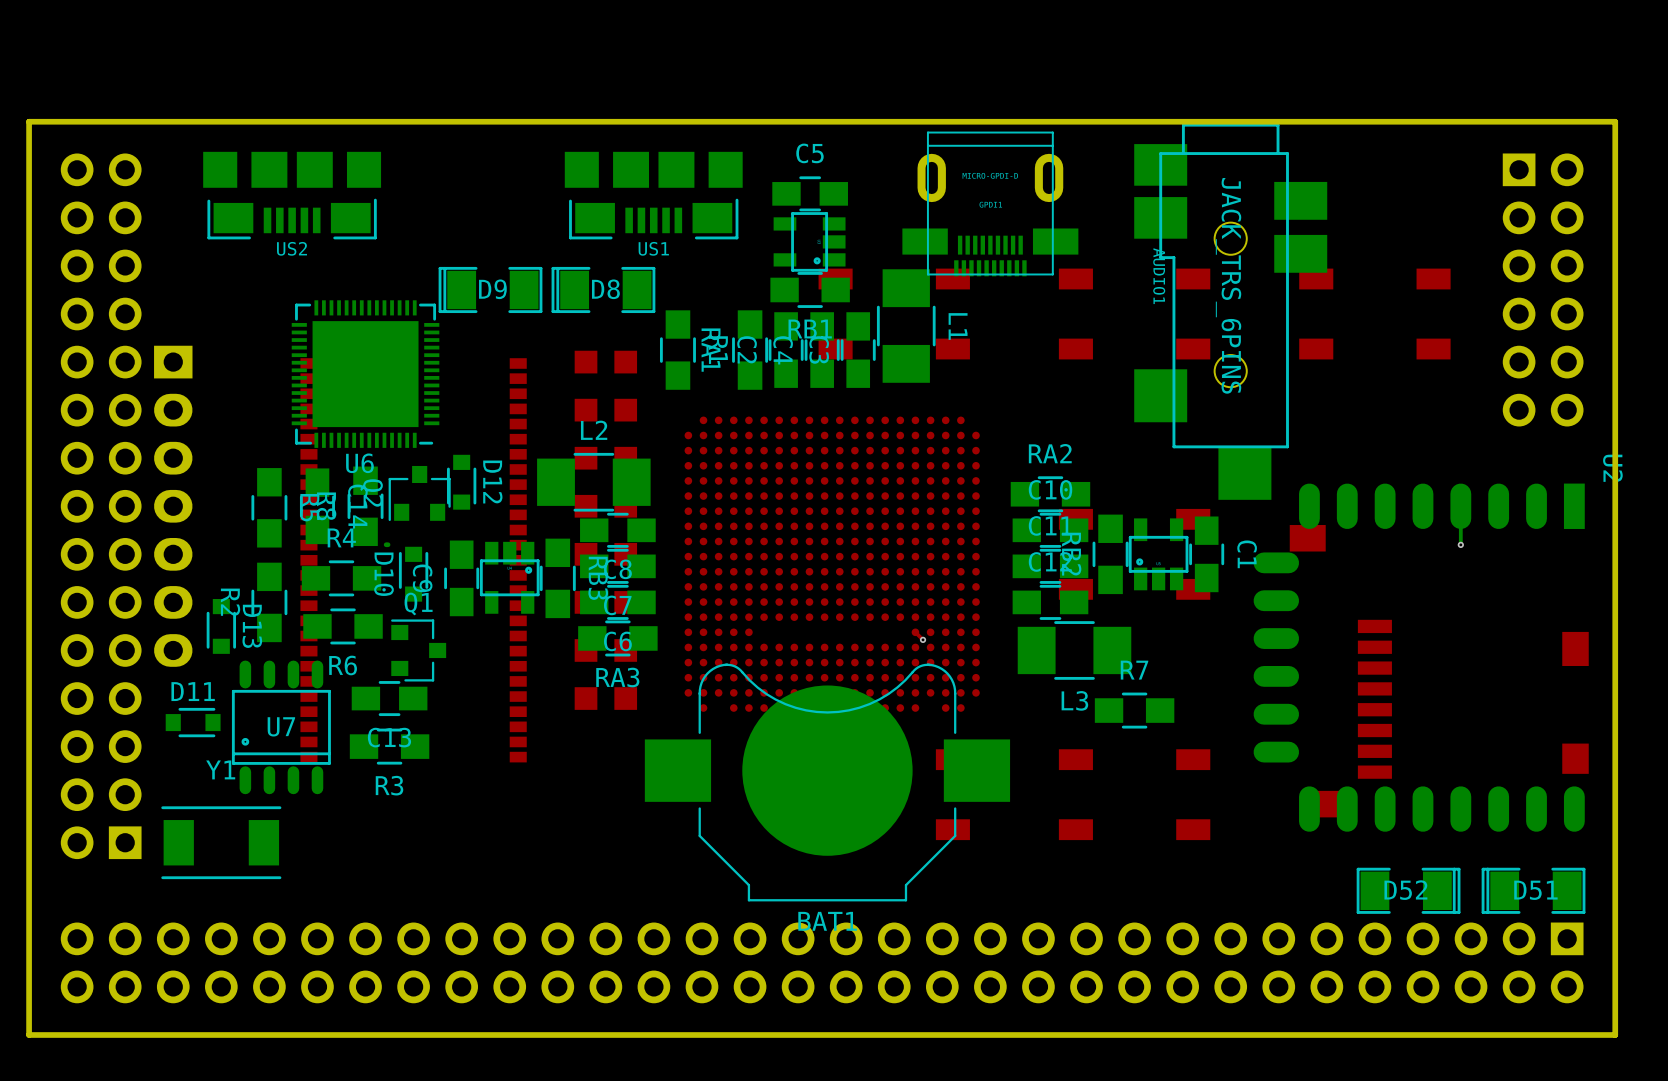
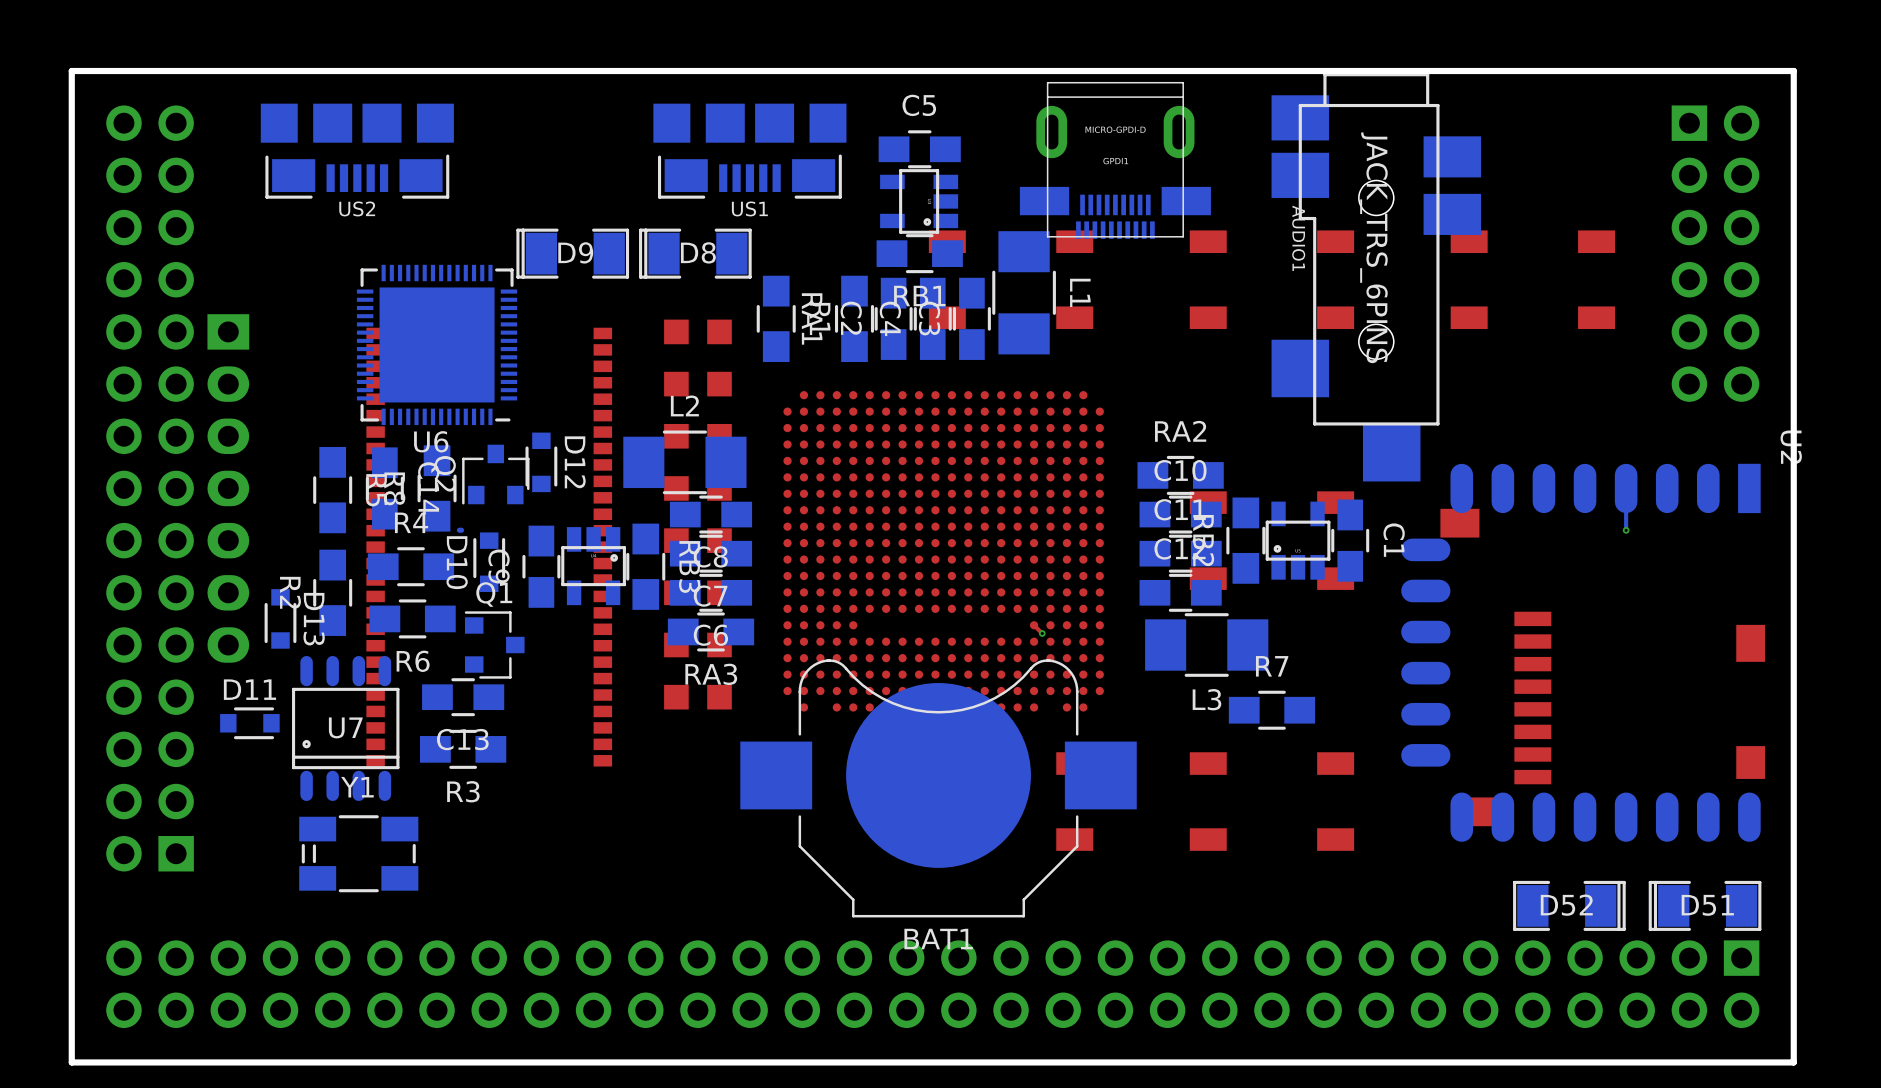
Y1 footprint: [161, 806, 282, 880] -> [299, 815, 419, 893]

